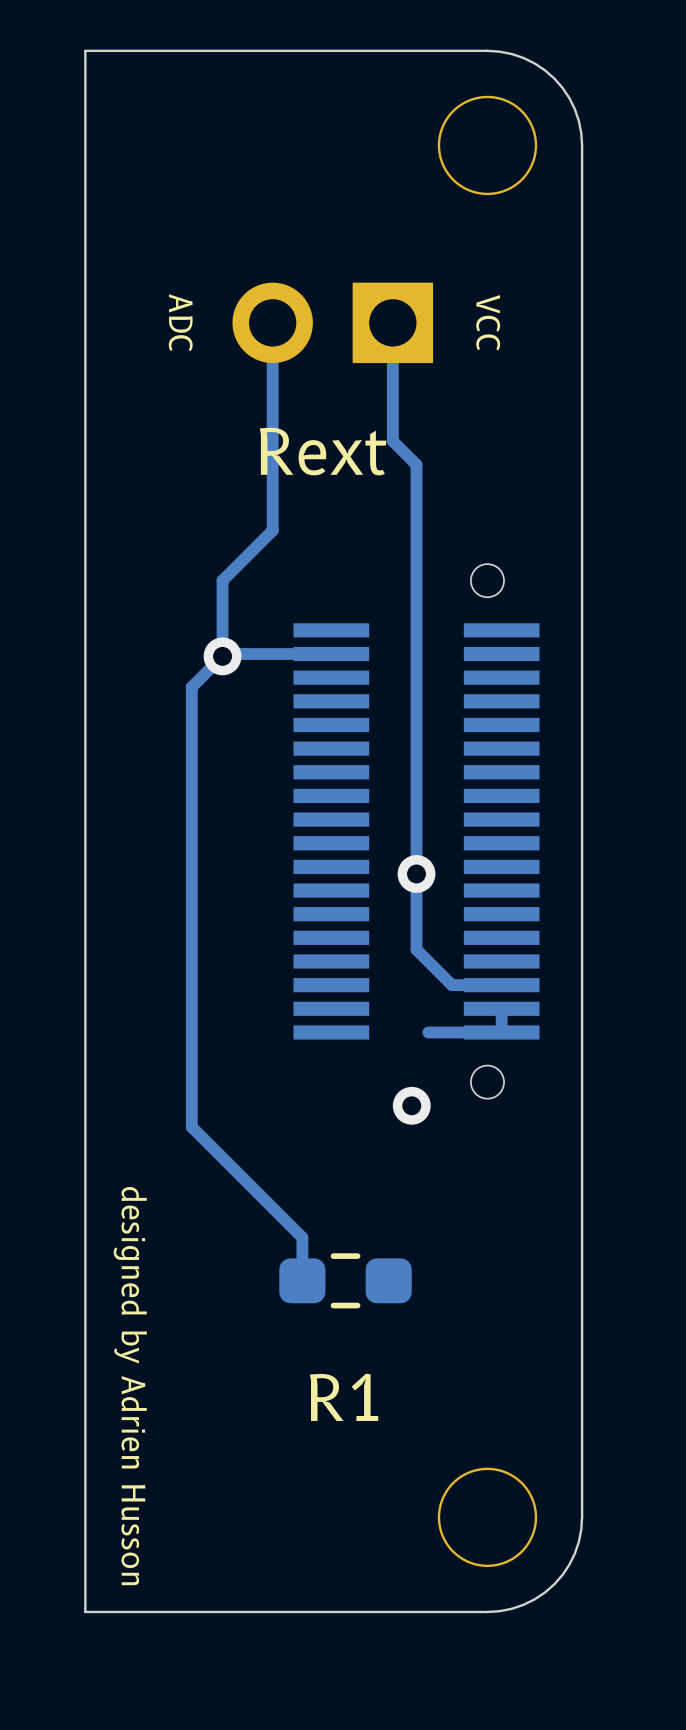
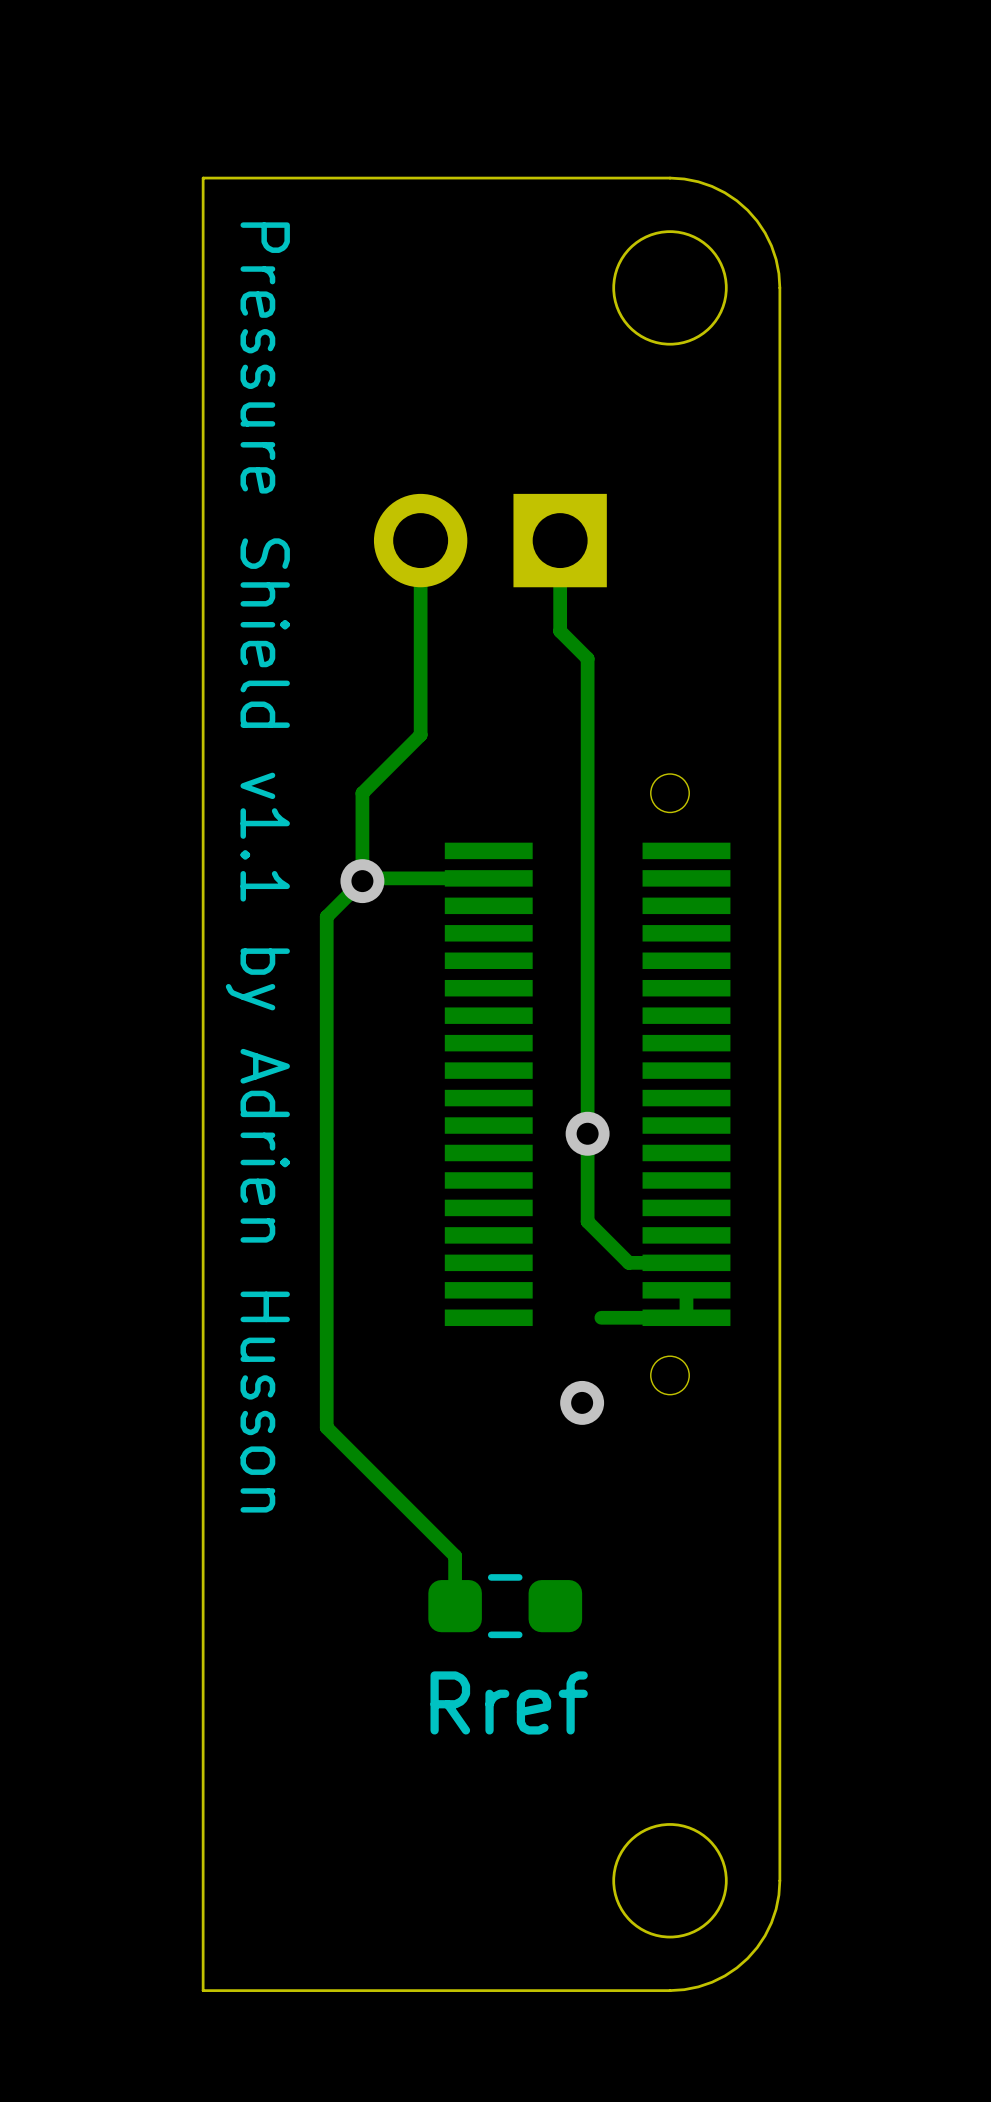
text: ADC (180, 322) -> none
part position: (332, 322) -> (490, 540)
text: VCC (488, 322) -> none
text: Rext (323, 451) -> none
text: none -> Pressure Shield v1.1 by Adrien Husson (257, 867)
text: designed by Adrien Husson (130, 1386) -> none
R1 name: R1 (344, 1397) -> Rref (509, 1702)

